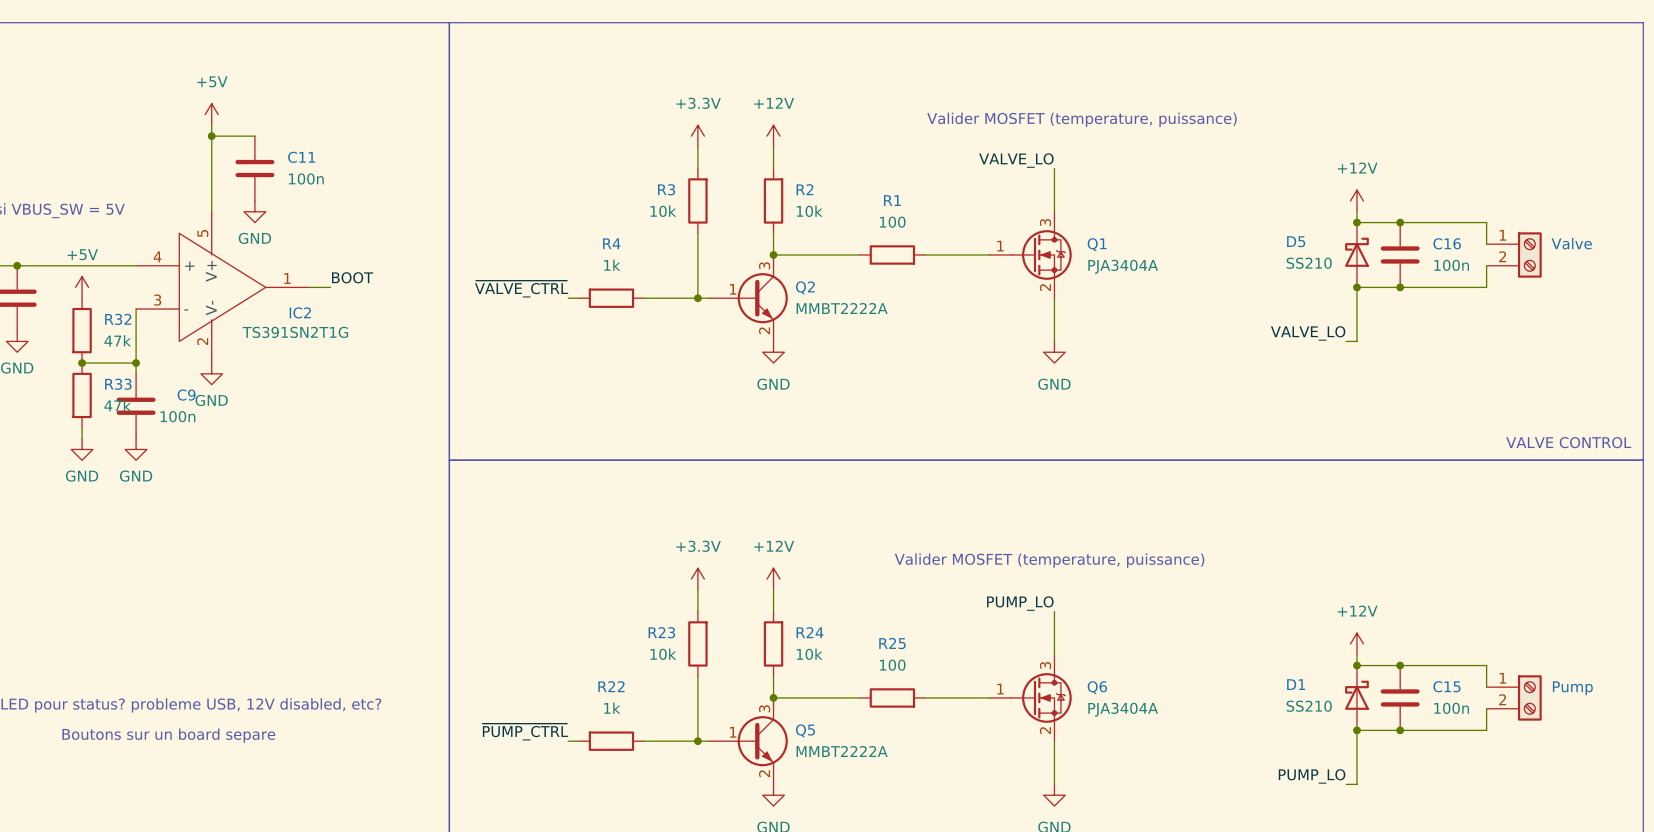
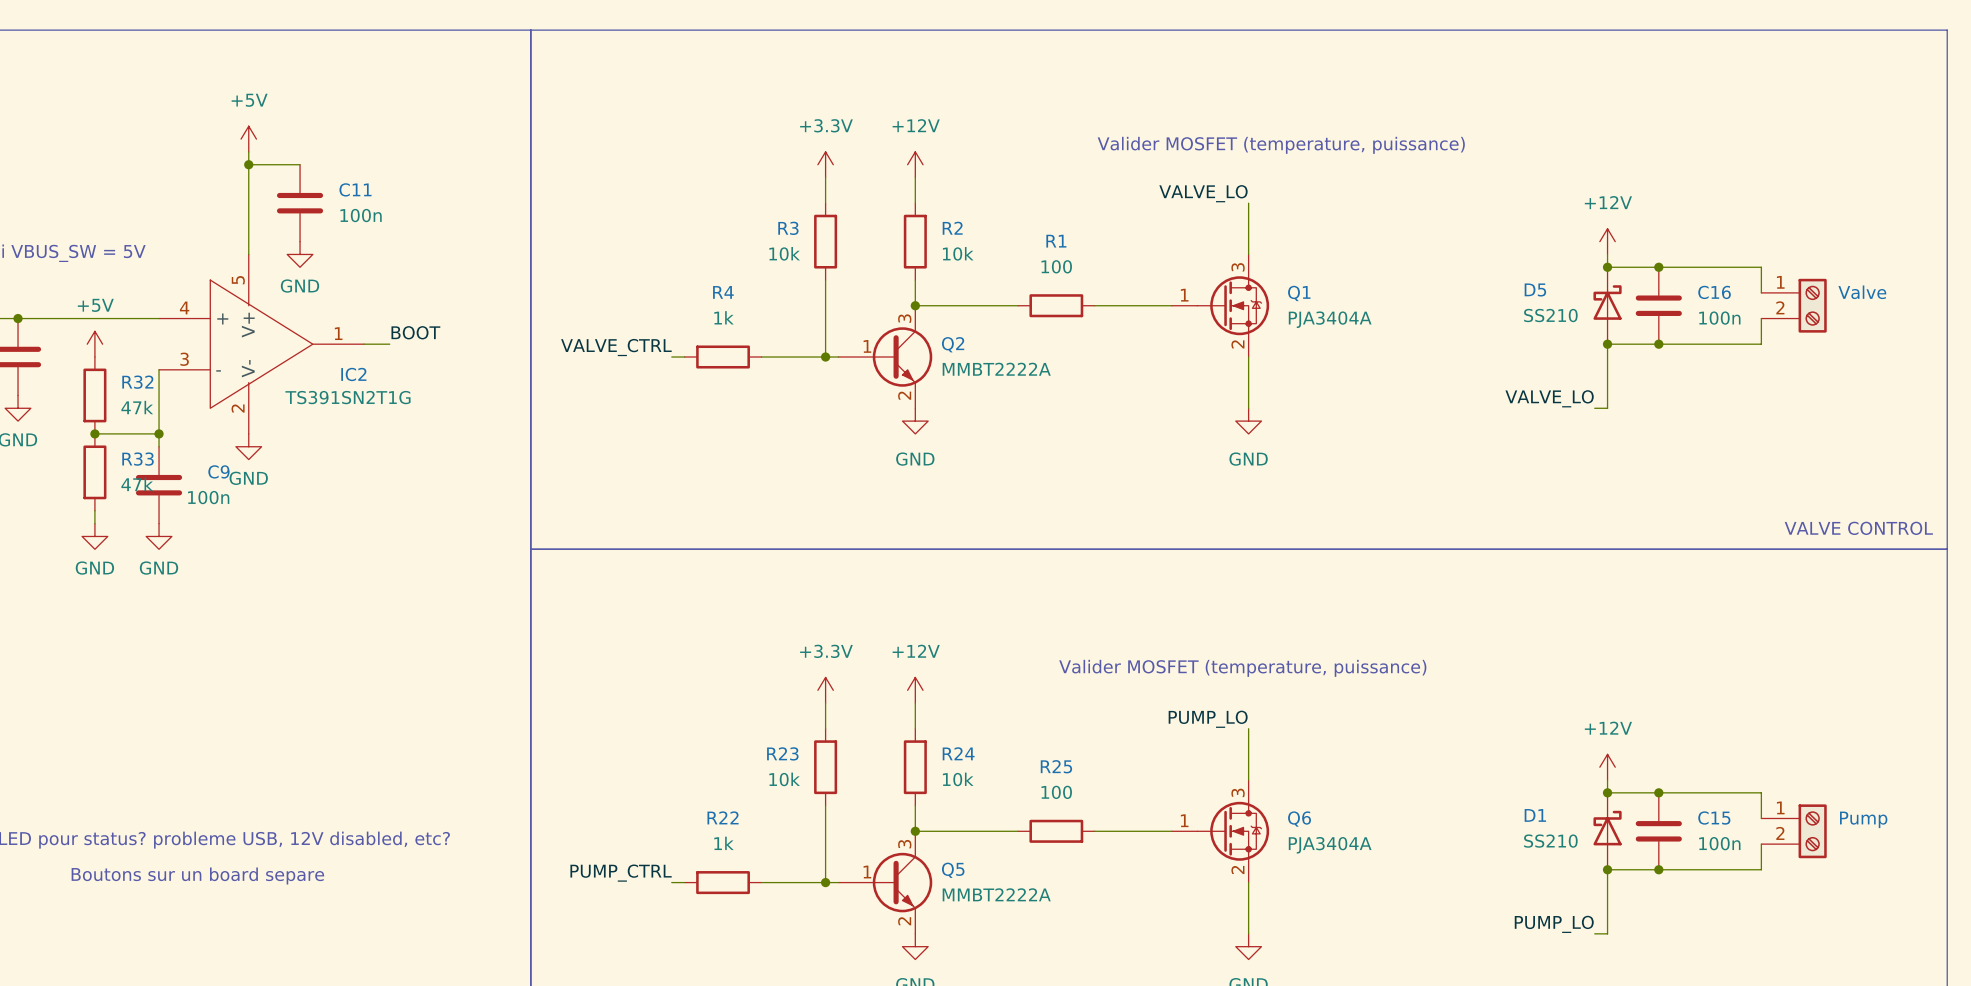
label: ~{VALVE_CTRL} (521, 289) -> VALVE_CTRL (616, 347)
label: ~{PUMP_CTRL} (525, 732) -> PUMP_CTRL (621, 873)

